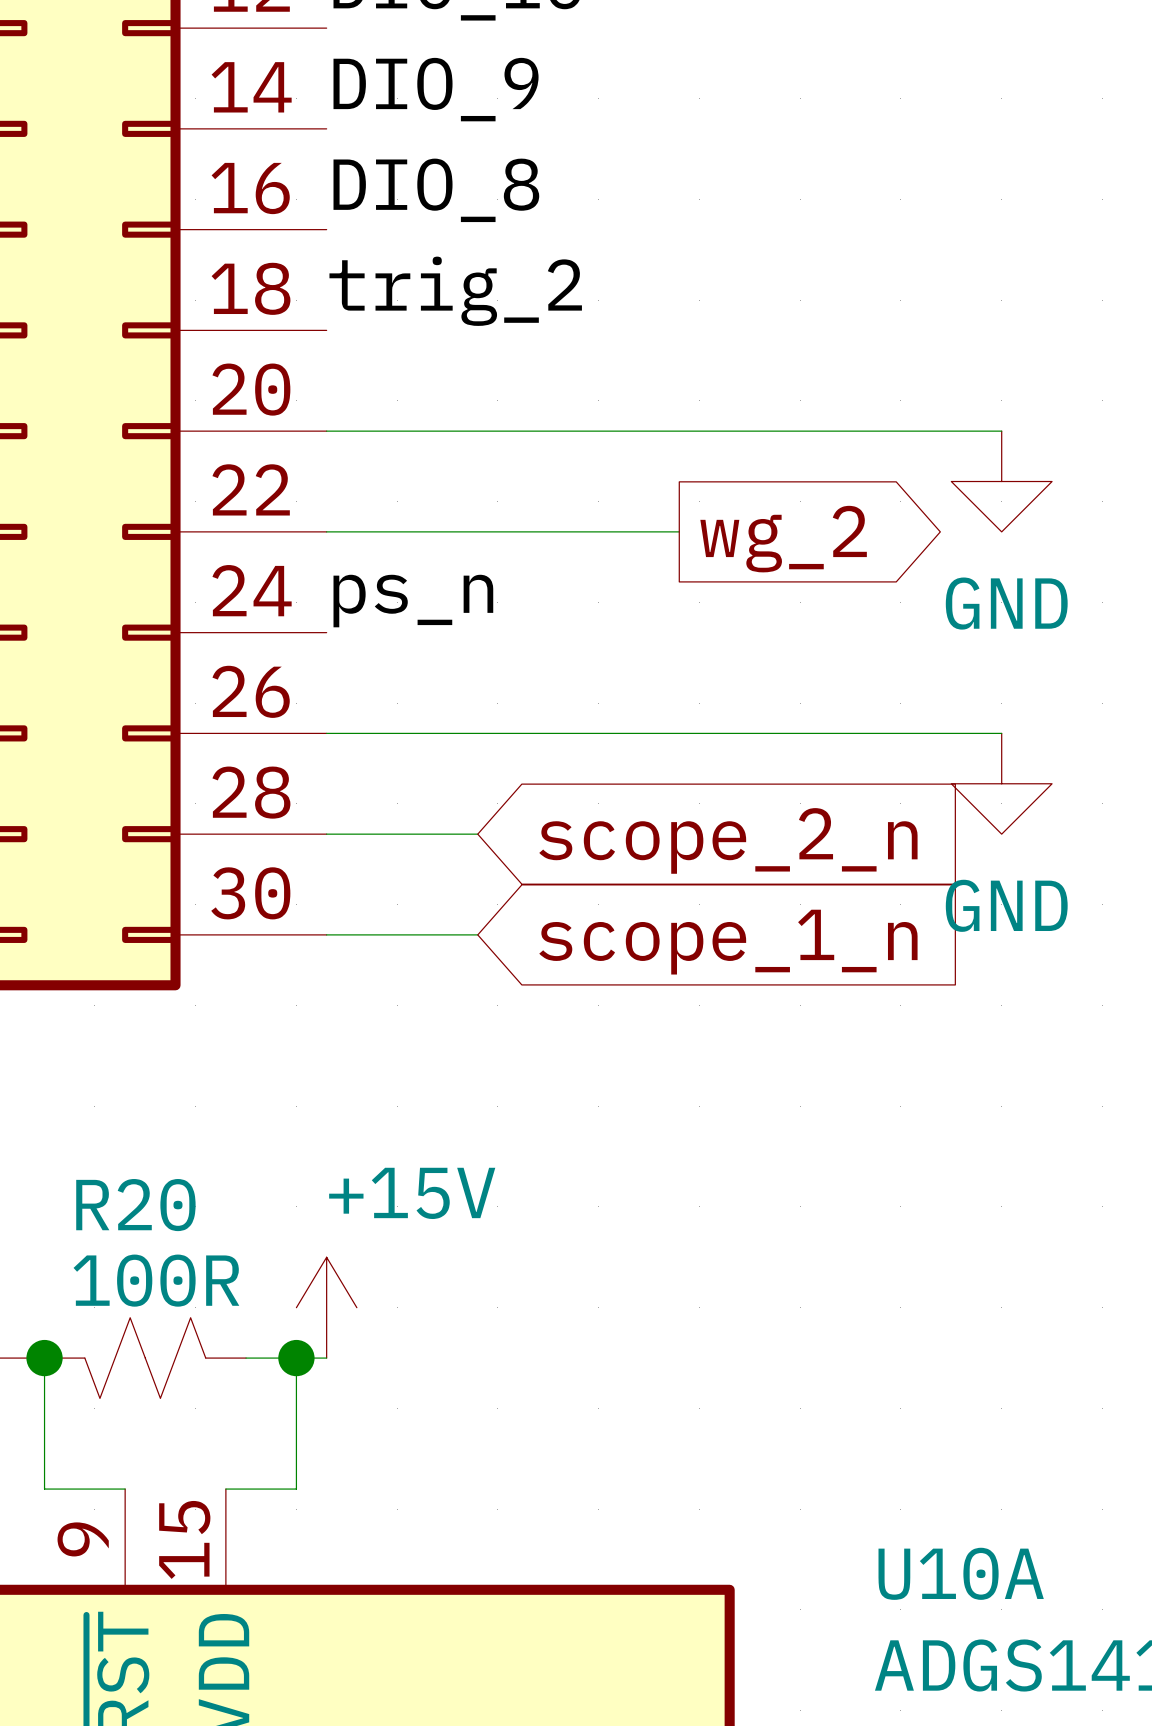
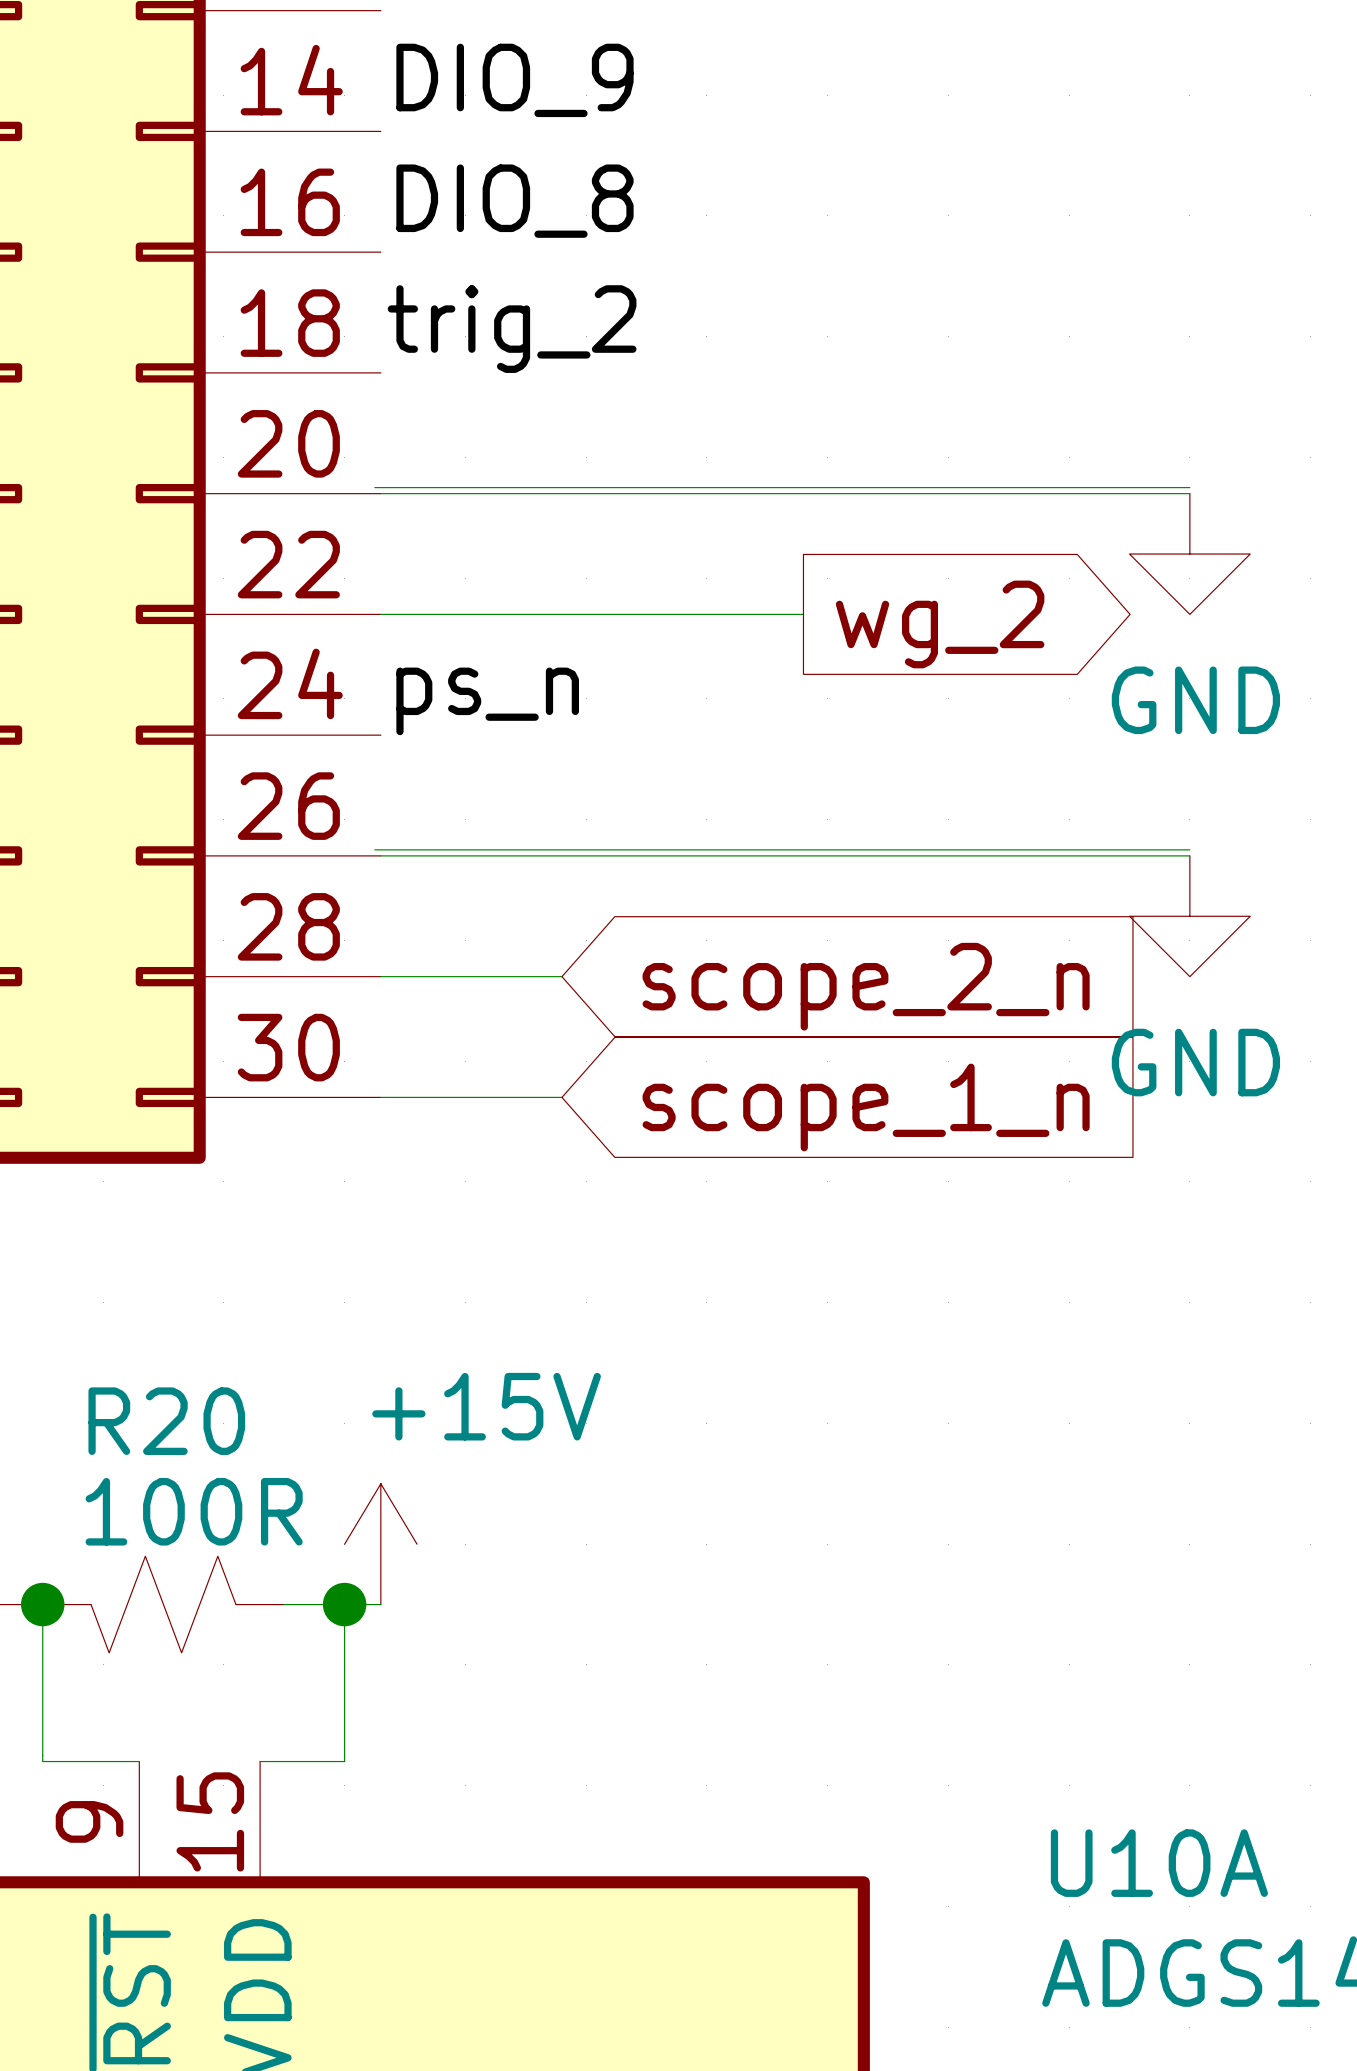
wire: none -> (374, 487) (1189, 487)
wire: none -> (374, 849) (1189, 849)

